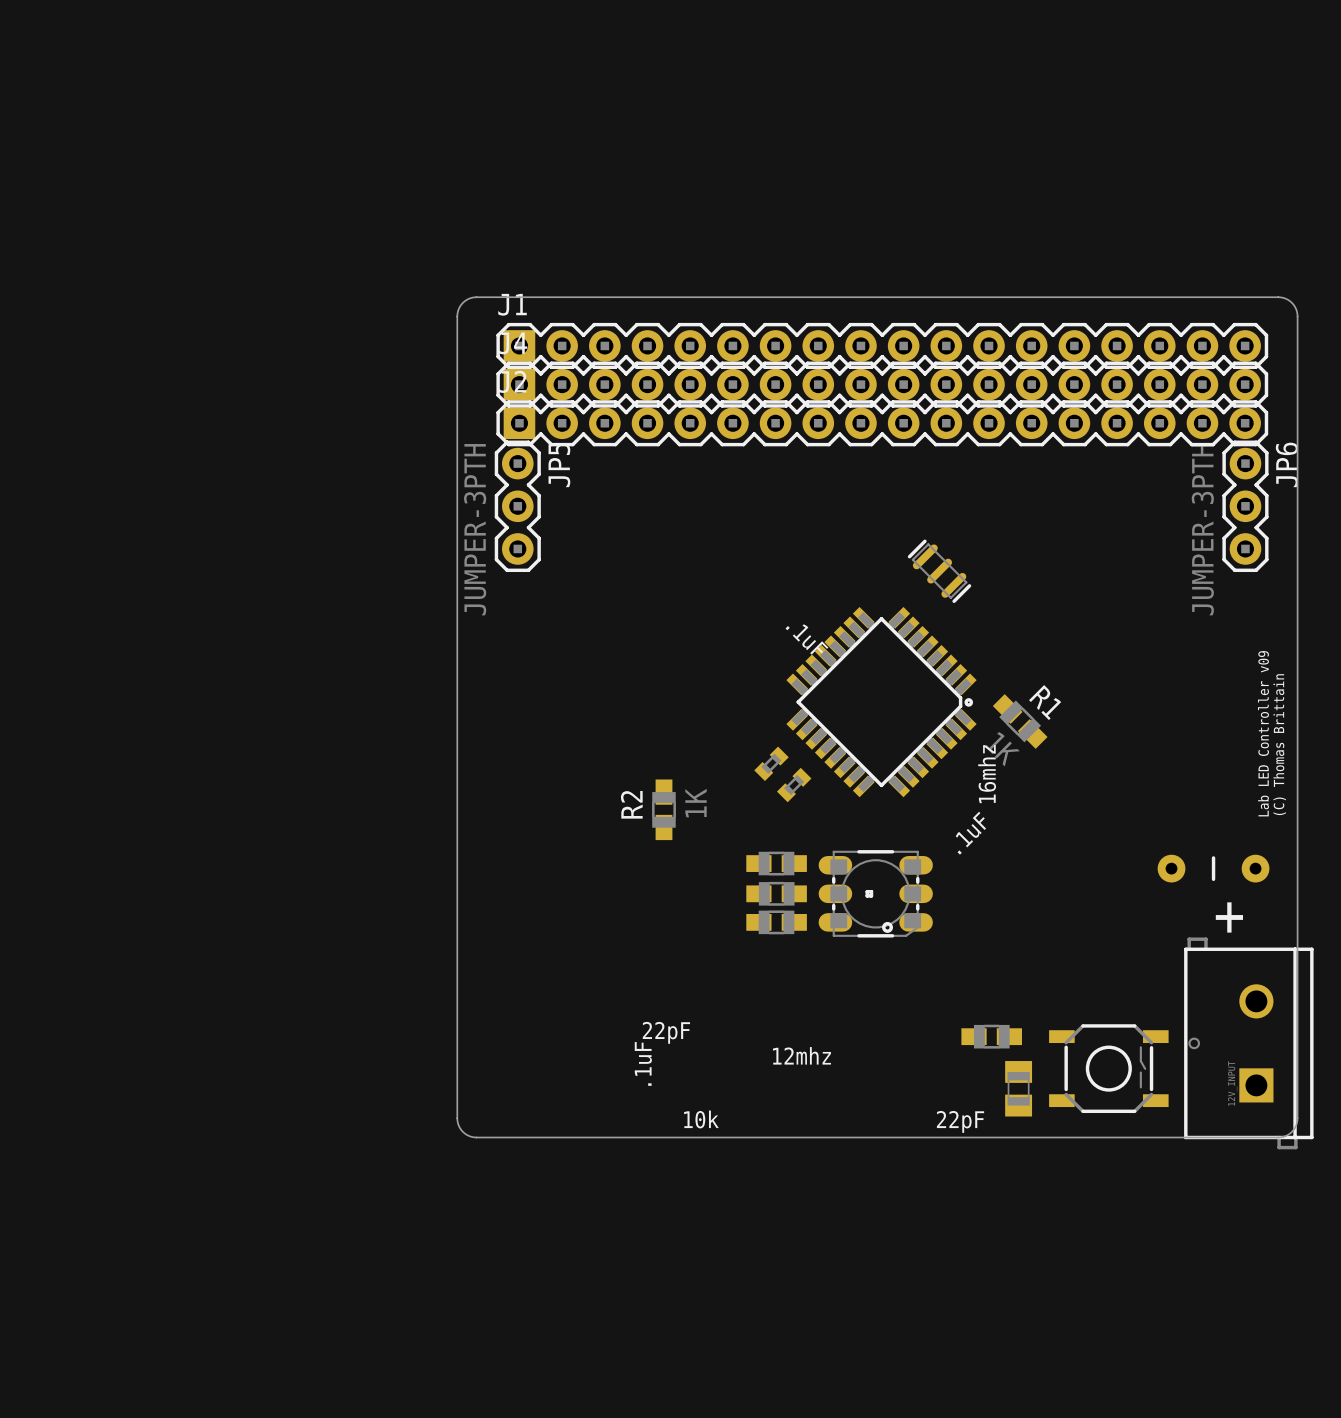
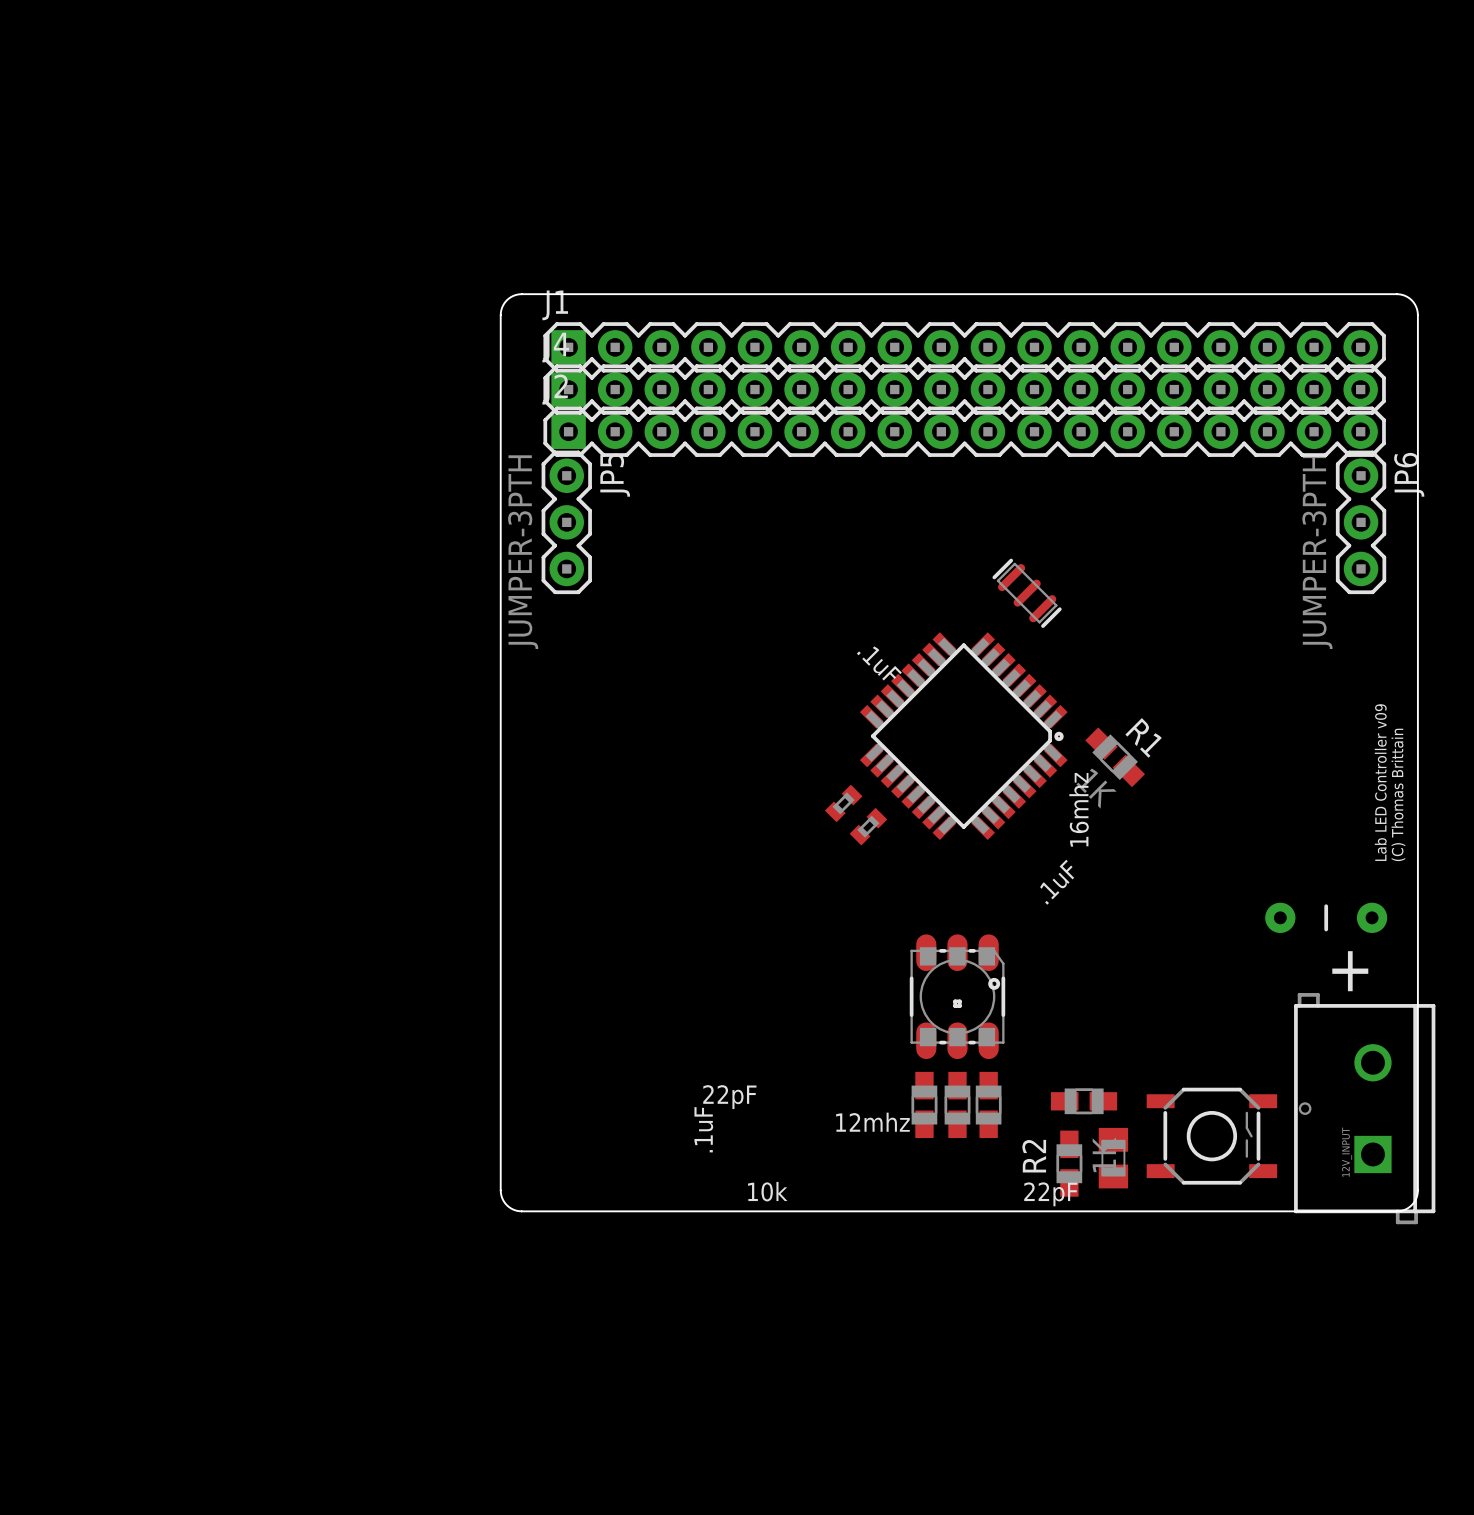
R2 position: (664, 809) -> (1069, 1163)
part: (776, 863) -> none
part: (776, 893) -> none
part rotation: 0° (875, 893) -> 90° counterclockwise (957, 996)
part: (776, 922) -> none
part: none -> (924, 1104)
part: none -> (957, 1104)
part: none -> (988, 1104)

